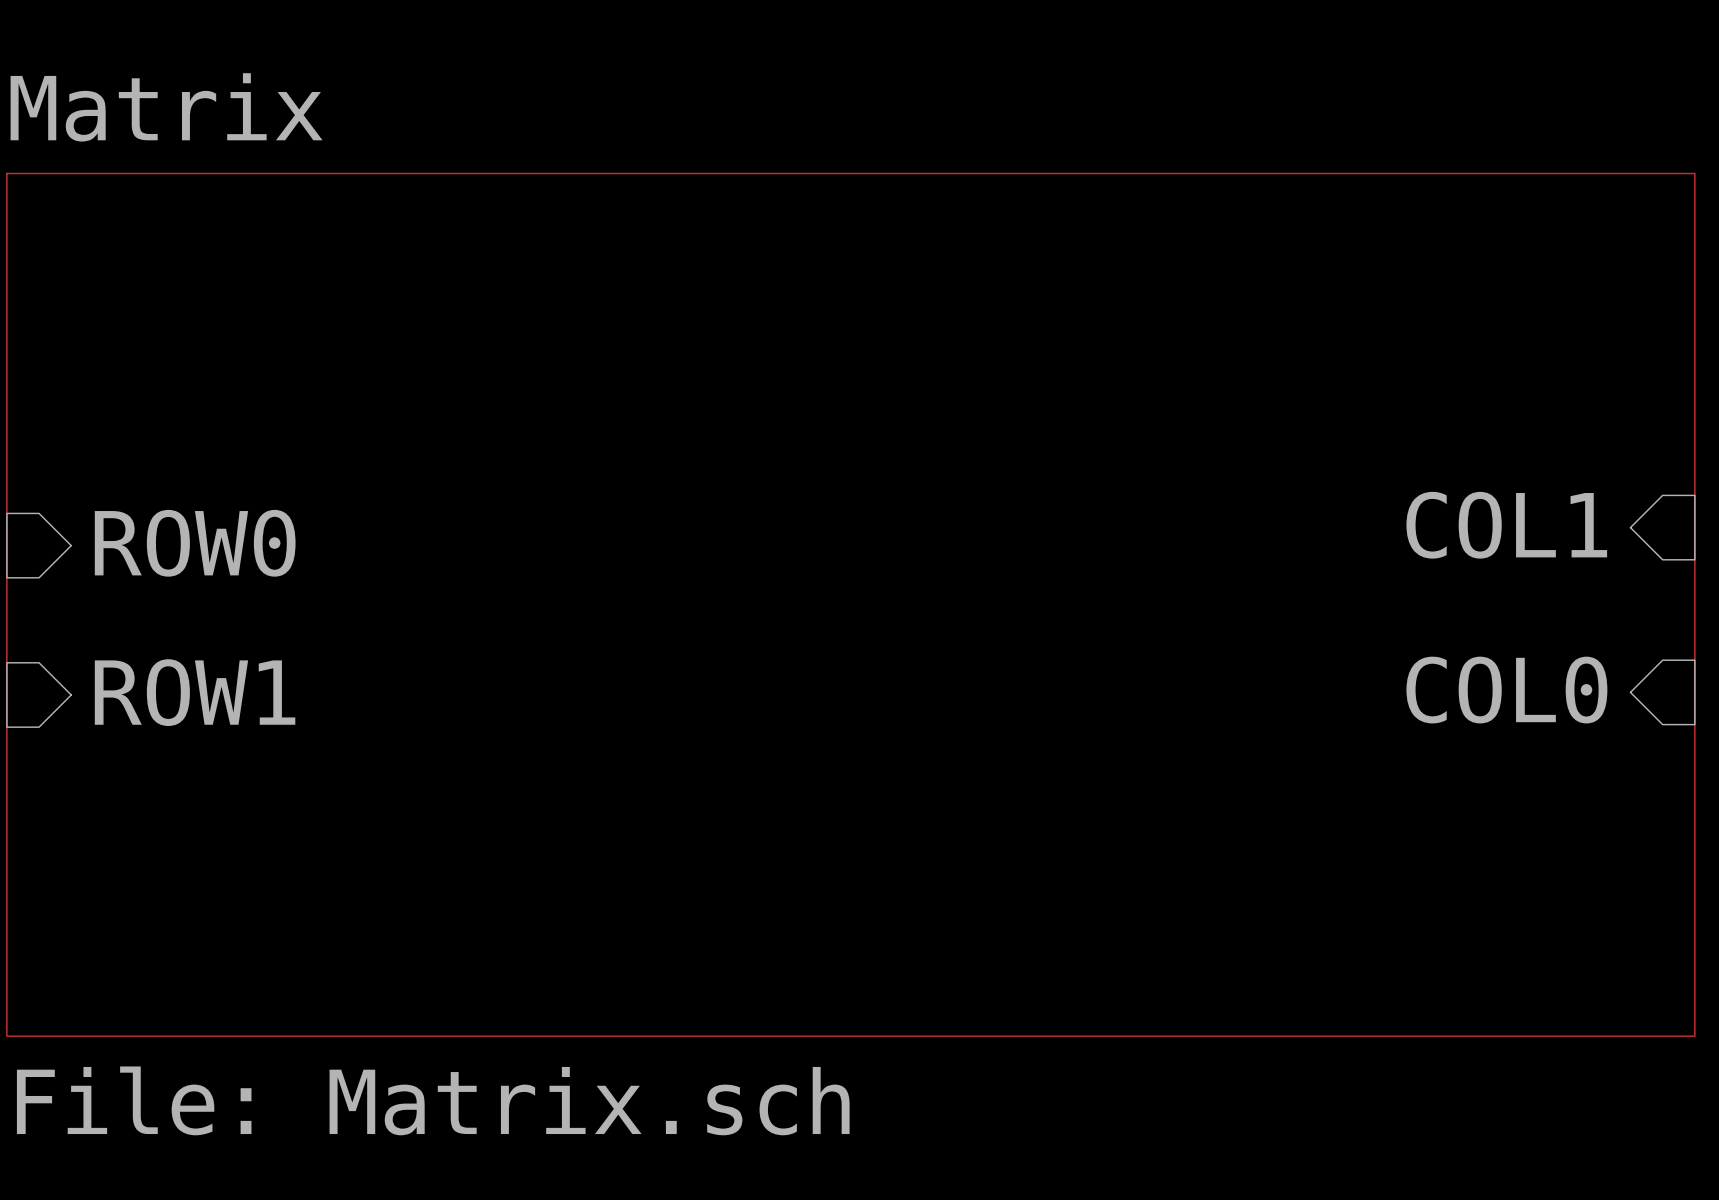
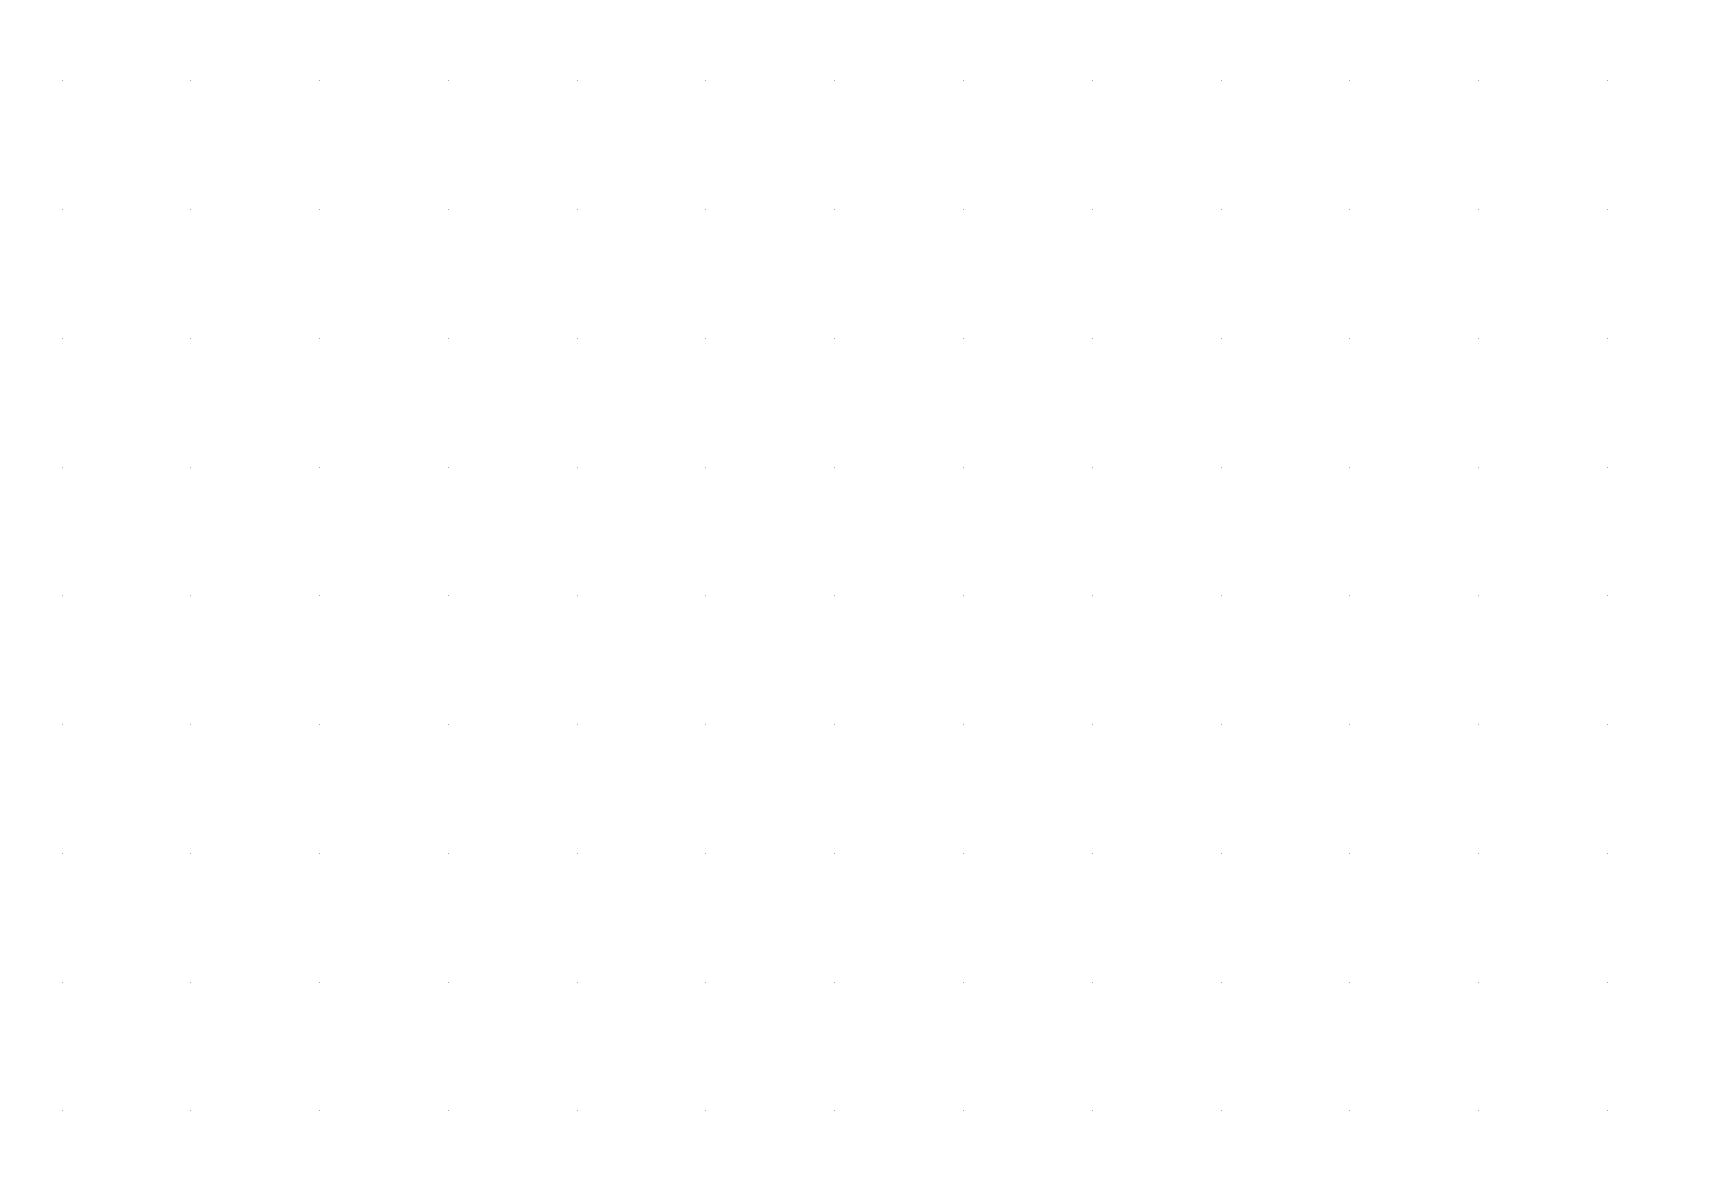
sheet pin: COL1 (1506, 525) -> none
sheet pin: ROW0 (195, 543) -> none
sheet Matrix: File: Matrix.sch (850, 604) -> none
sheet pin: COL0 (1506, 690) -> none
sheet pin: ROW1 (195, 692) -> none

